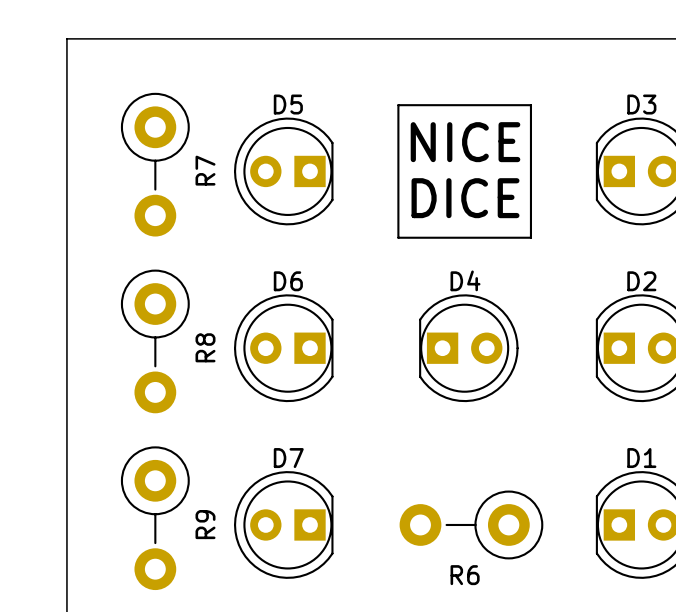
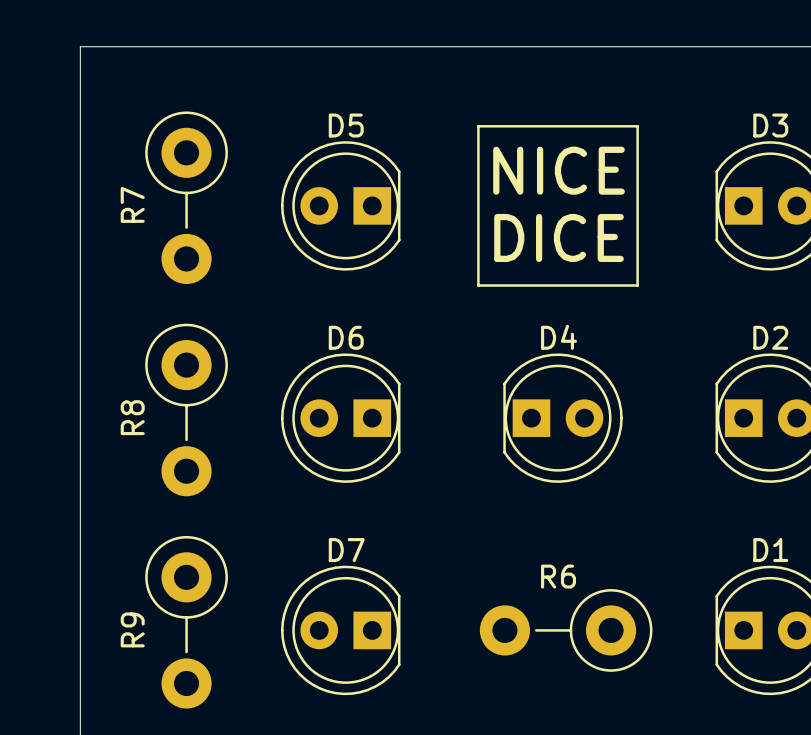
R7 name position: R7 (205, 170) -> R7 (132, 204)
R8 name position: R8 (205, 347) -> R8 (132, 417)
R9 name position: R9 (205, 524) -> R9 (132, 629)
R6 name position: R6 (465, 575) -> R6 (558, 576)

